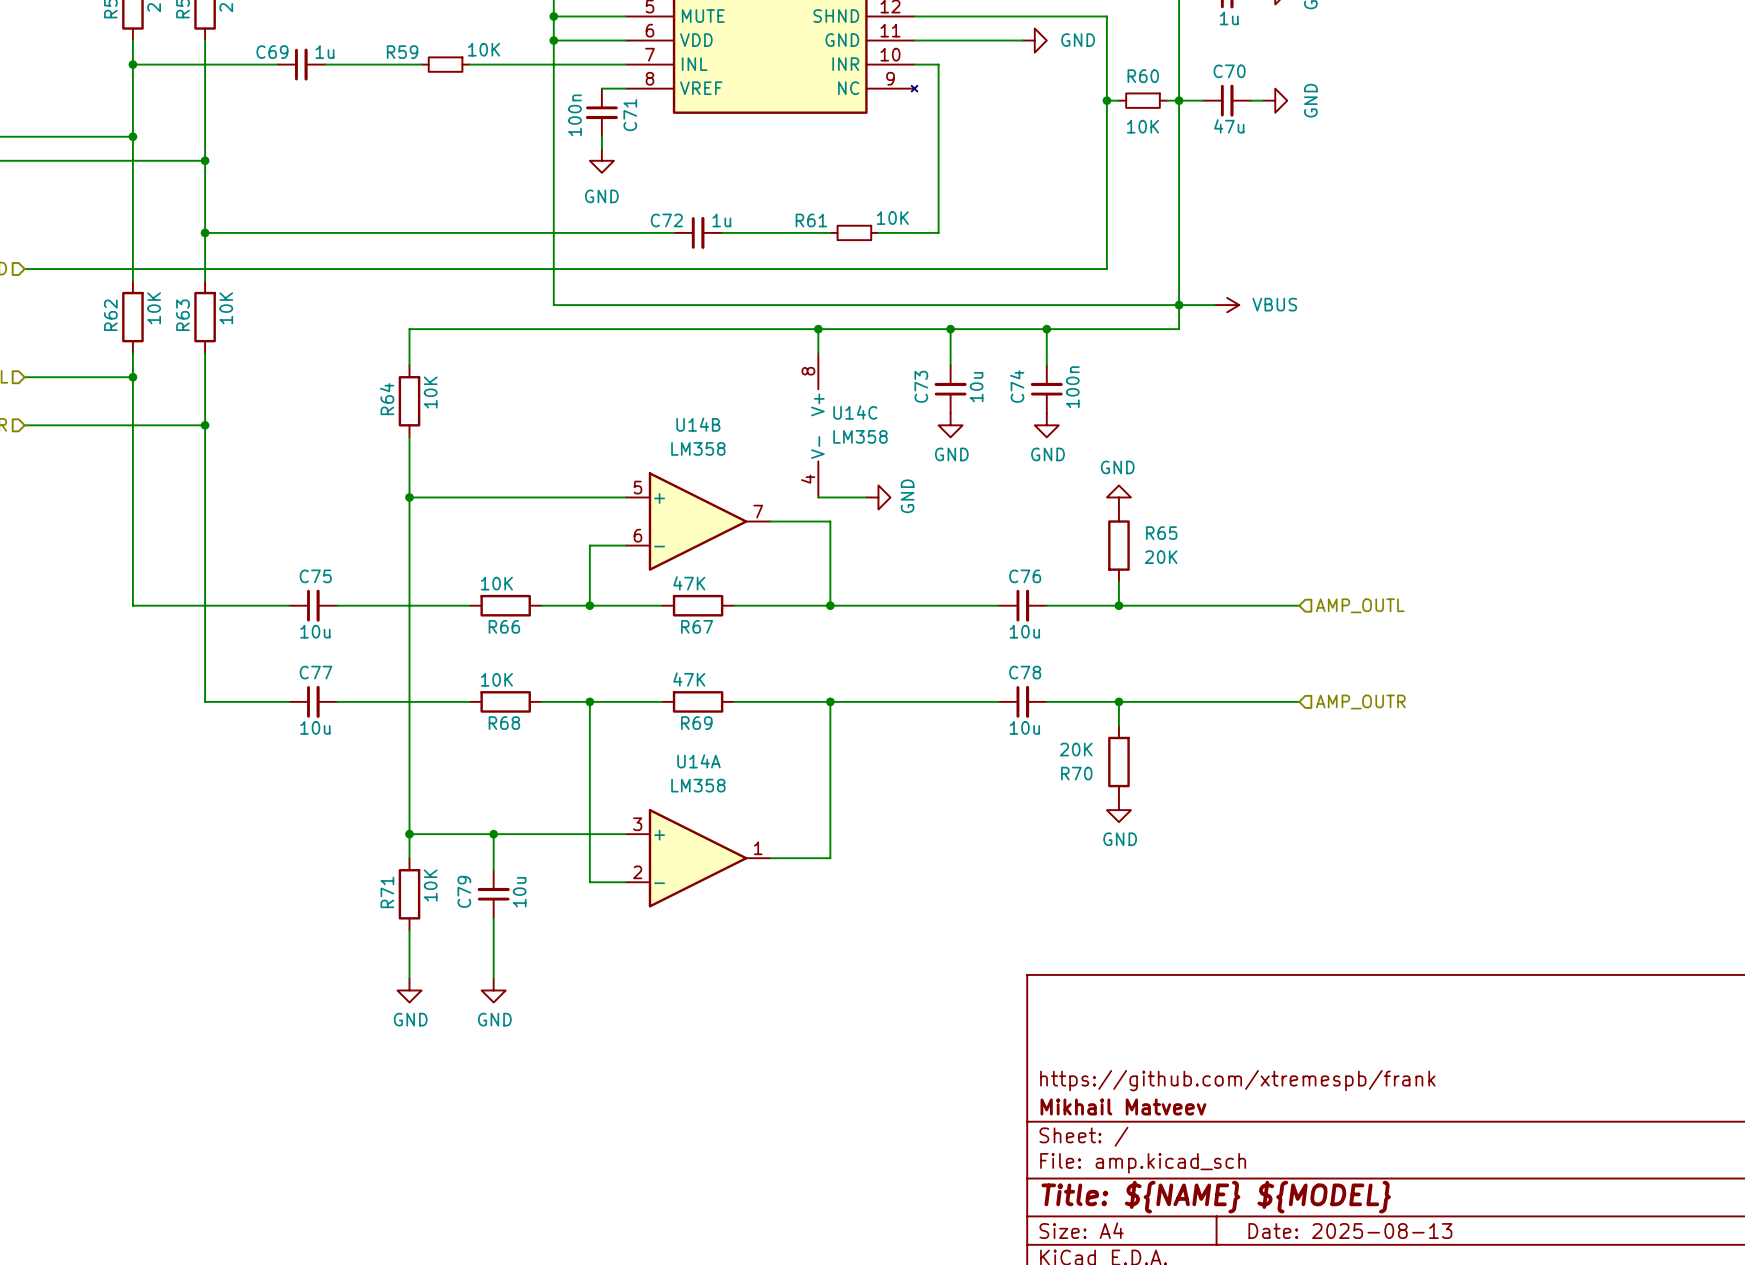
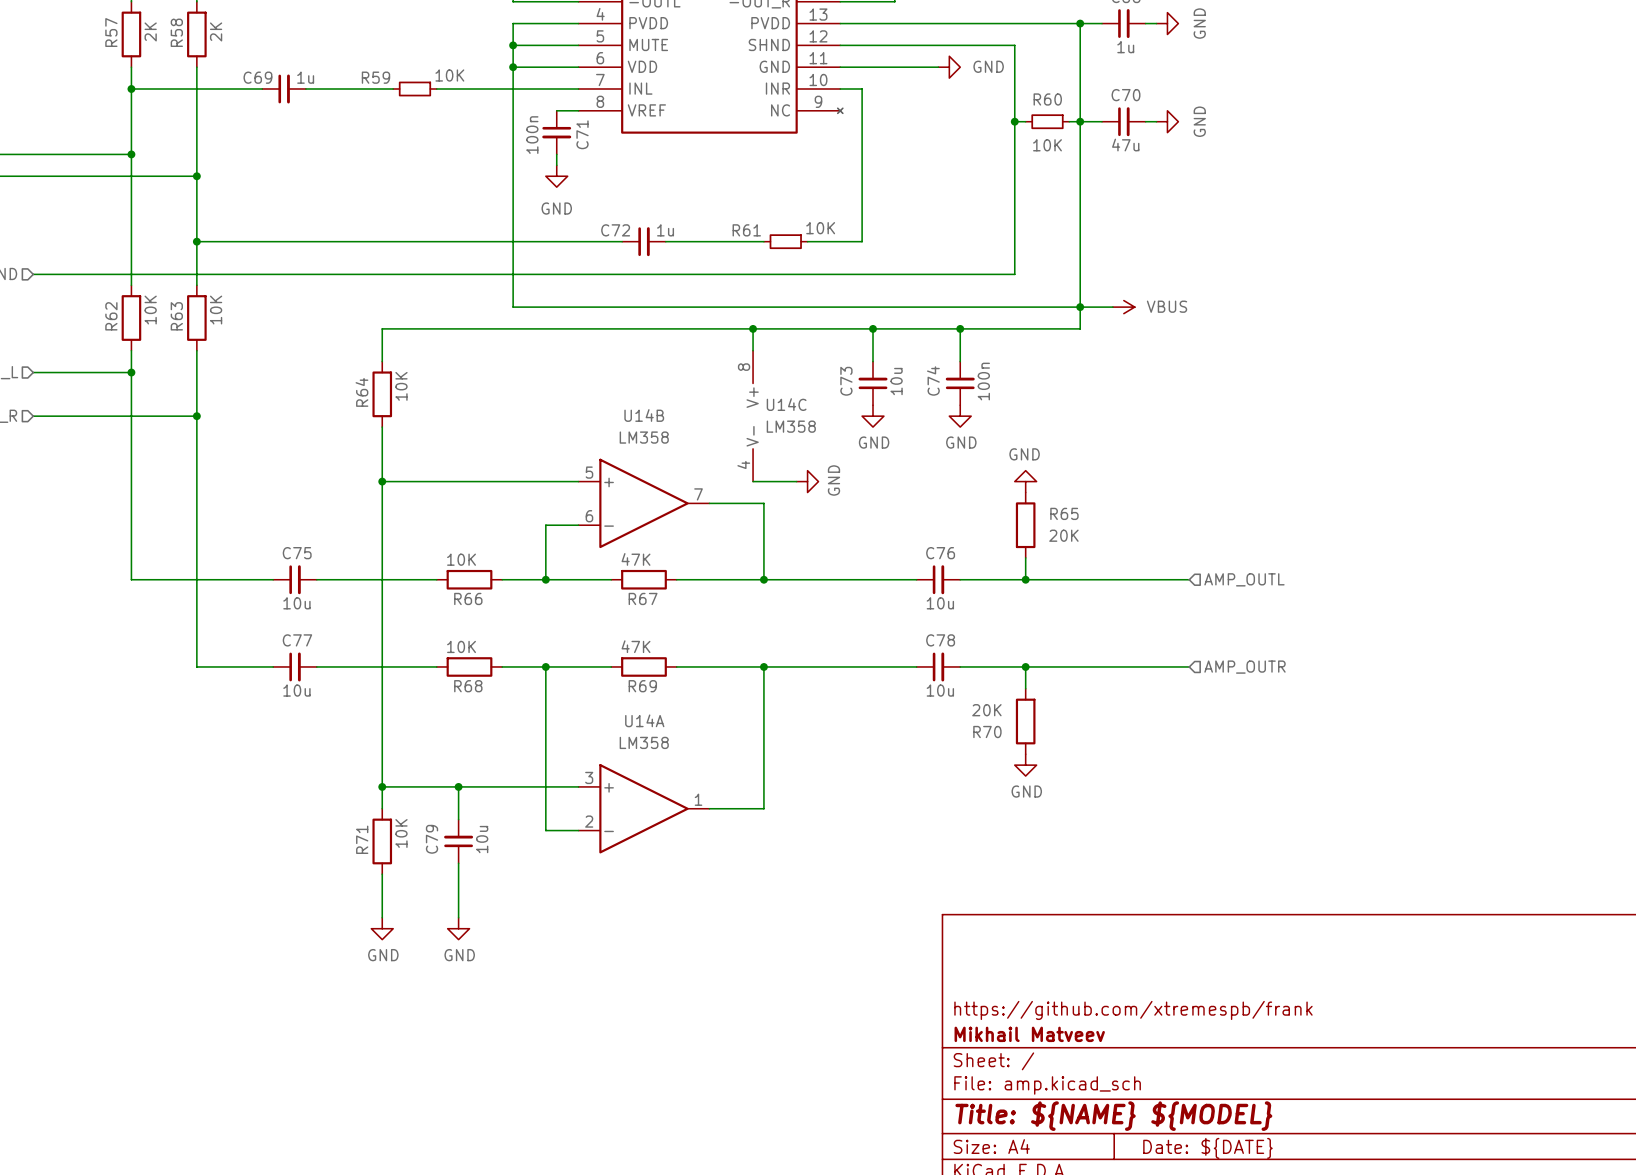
title block: Date: 2025-08-13 (1350, 1231) -> Date: ${DATE} (1207, 1148)

